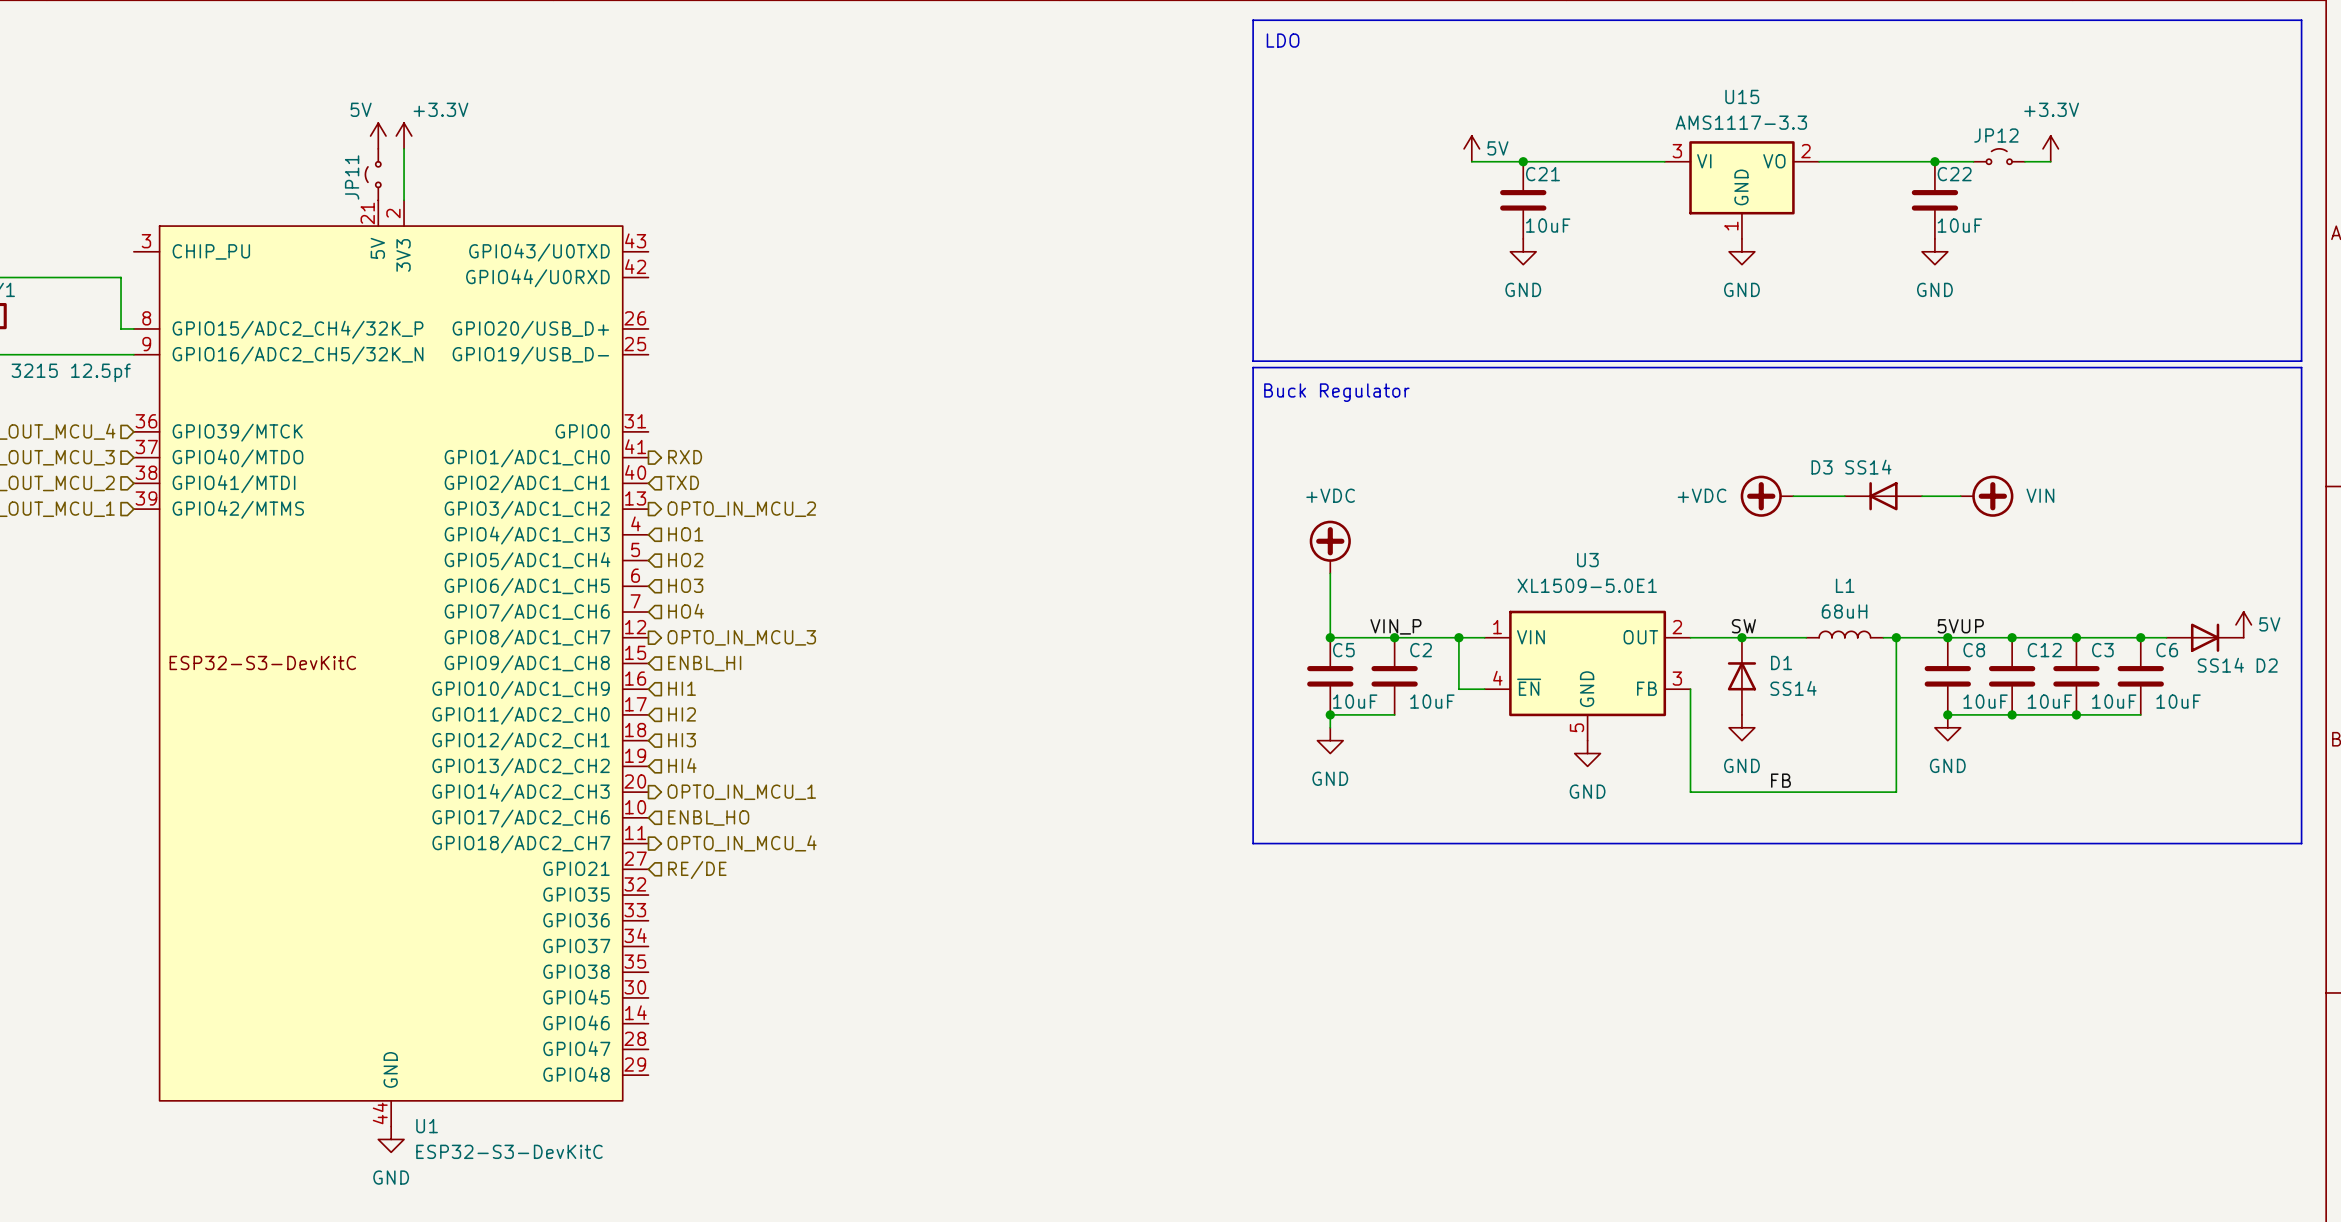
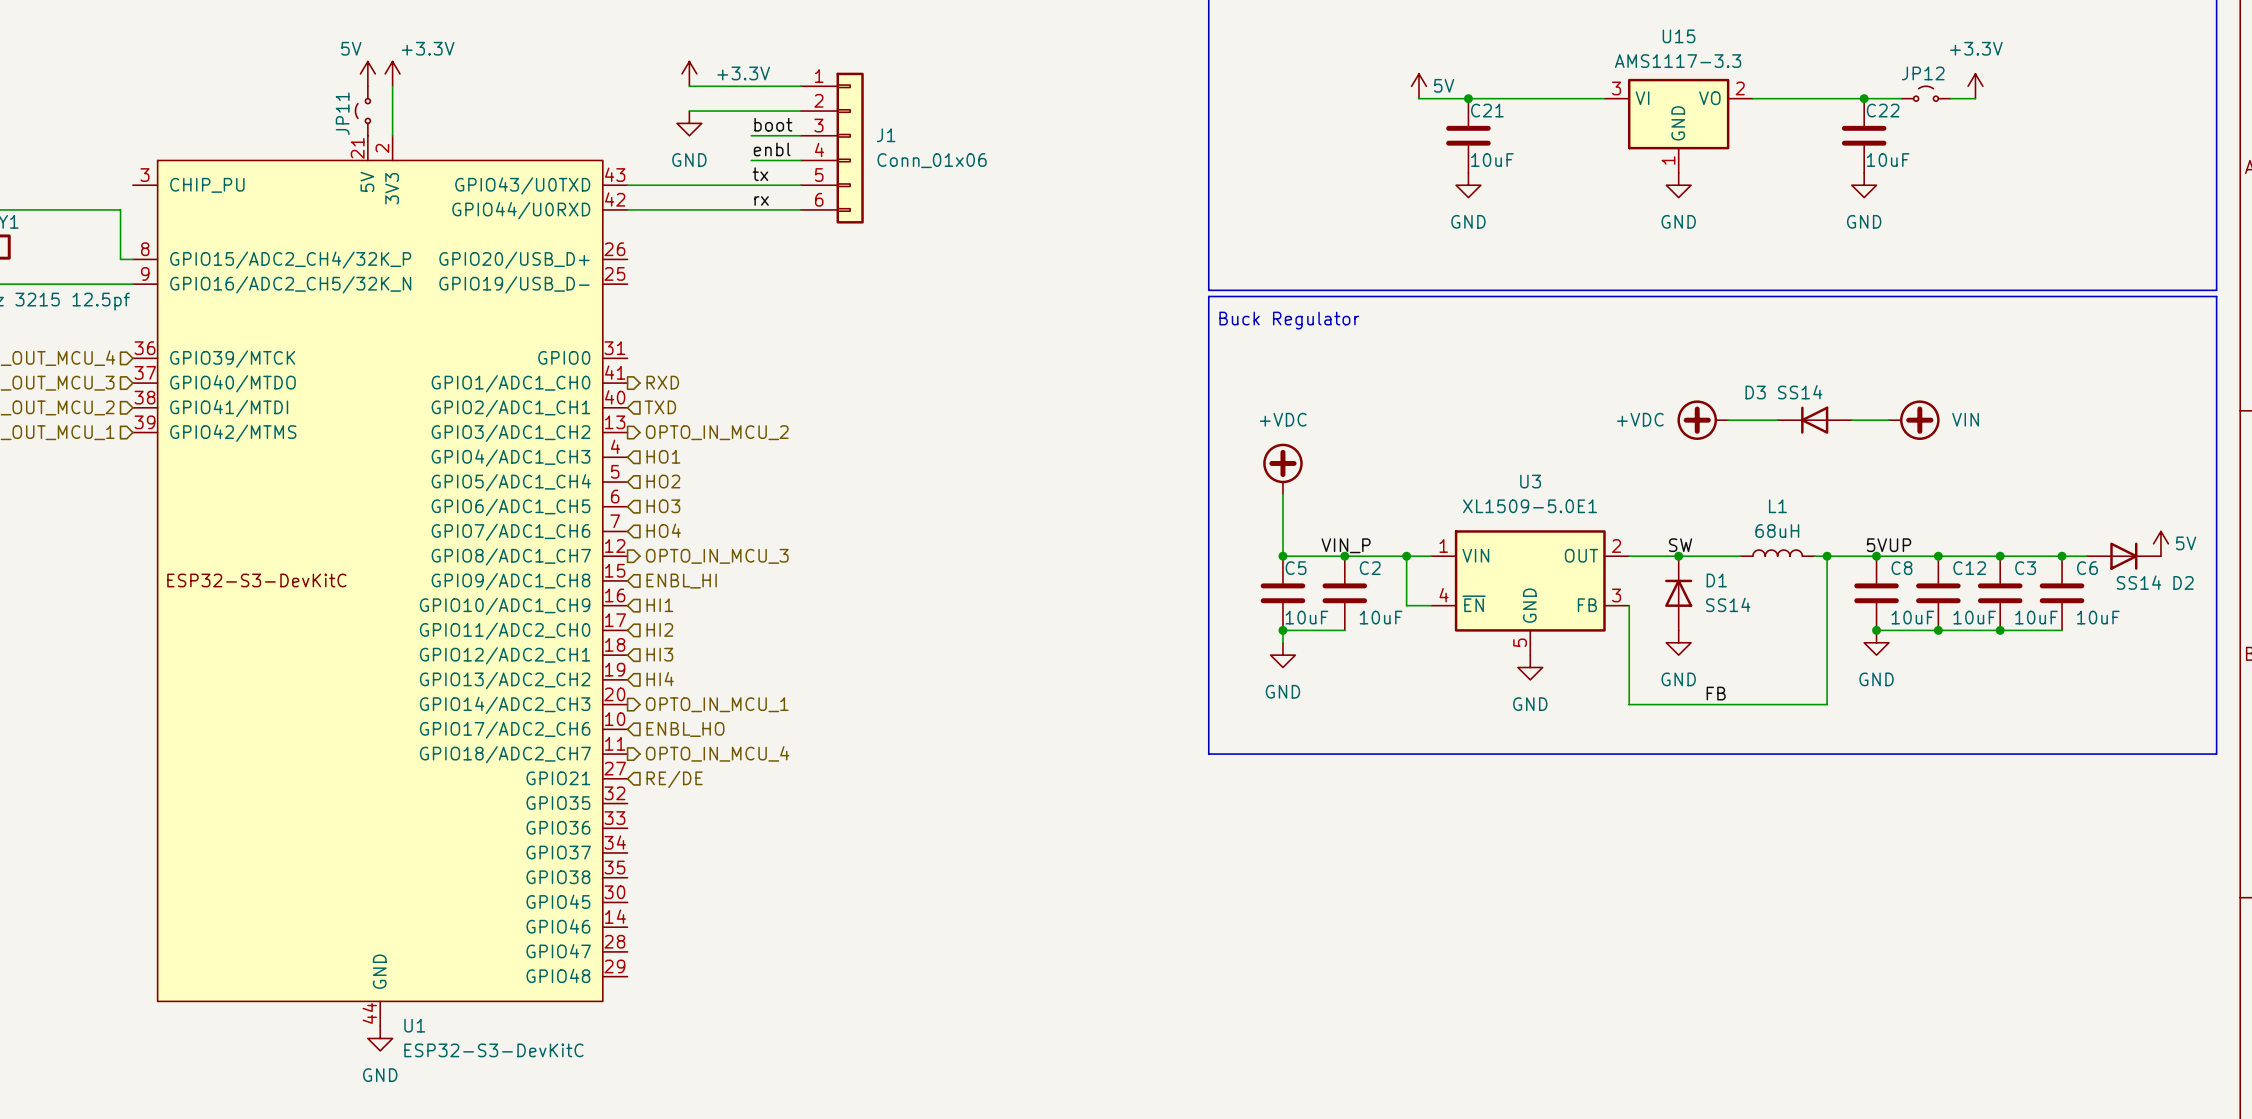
power symbol: none -> +3.3V (689, 73)
wire: none -> (689, 86) (800, 86)
wire: none -> (689, 111) (800, 111)
power symbol: none -> GND (689, 123)
label: none -> boot (773, 124)
wire: none -> (751, 135) (800, 135)
J1: none -> Conn_01x06 (832, 148)
label: none -> enbl (772, 149)
wire: none -> (751, 160) (800, 160)
label: none -> tx (760, 174)
wire: none -> (627, 185) (800, 185)
label: none -> rx (761, 200)
wire: none -> (627, 209) (800, 209)

